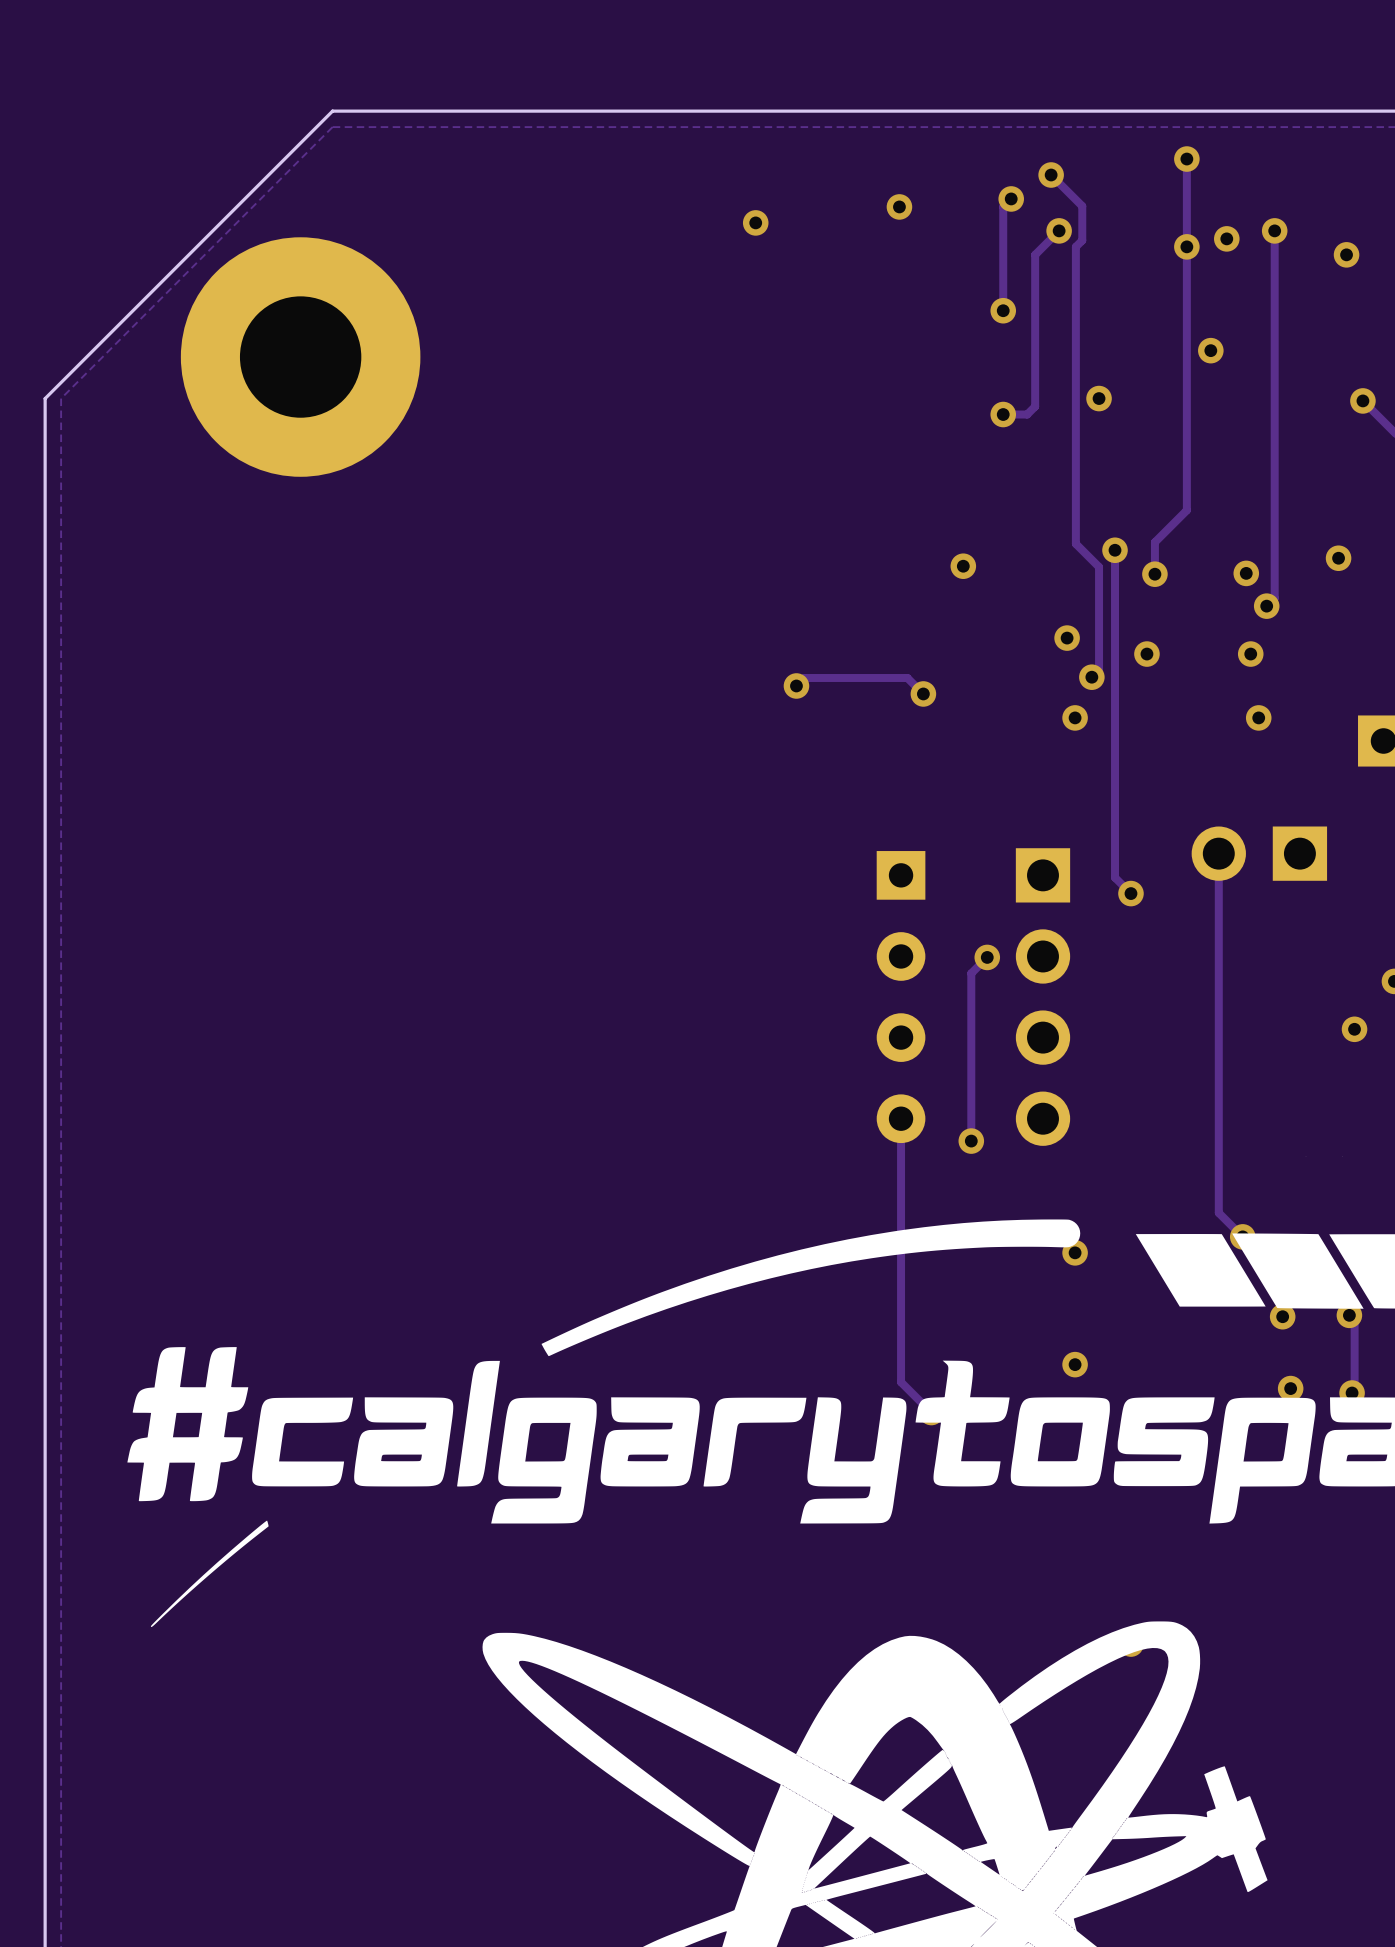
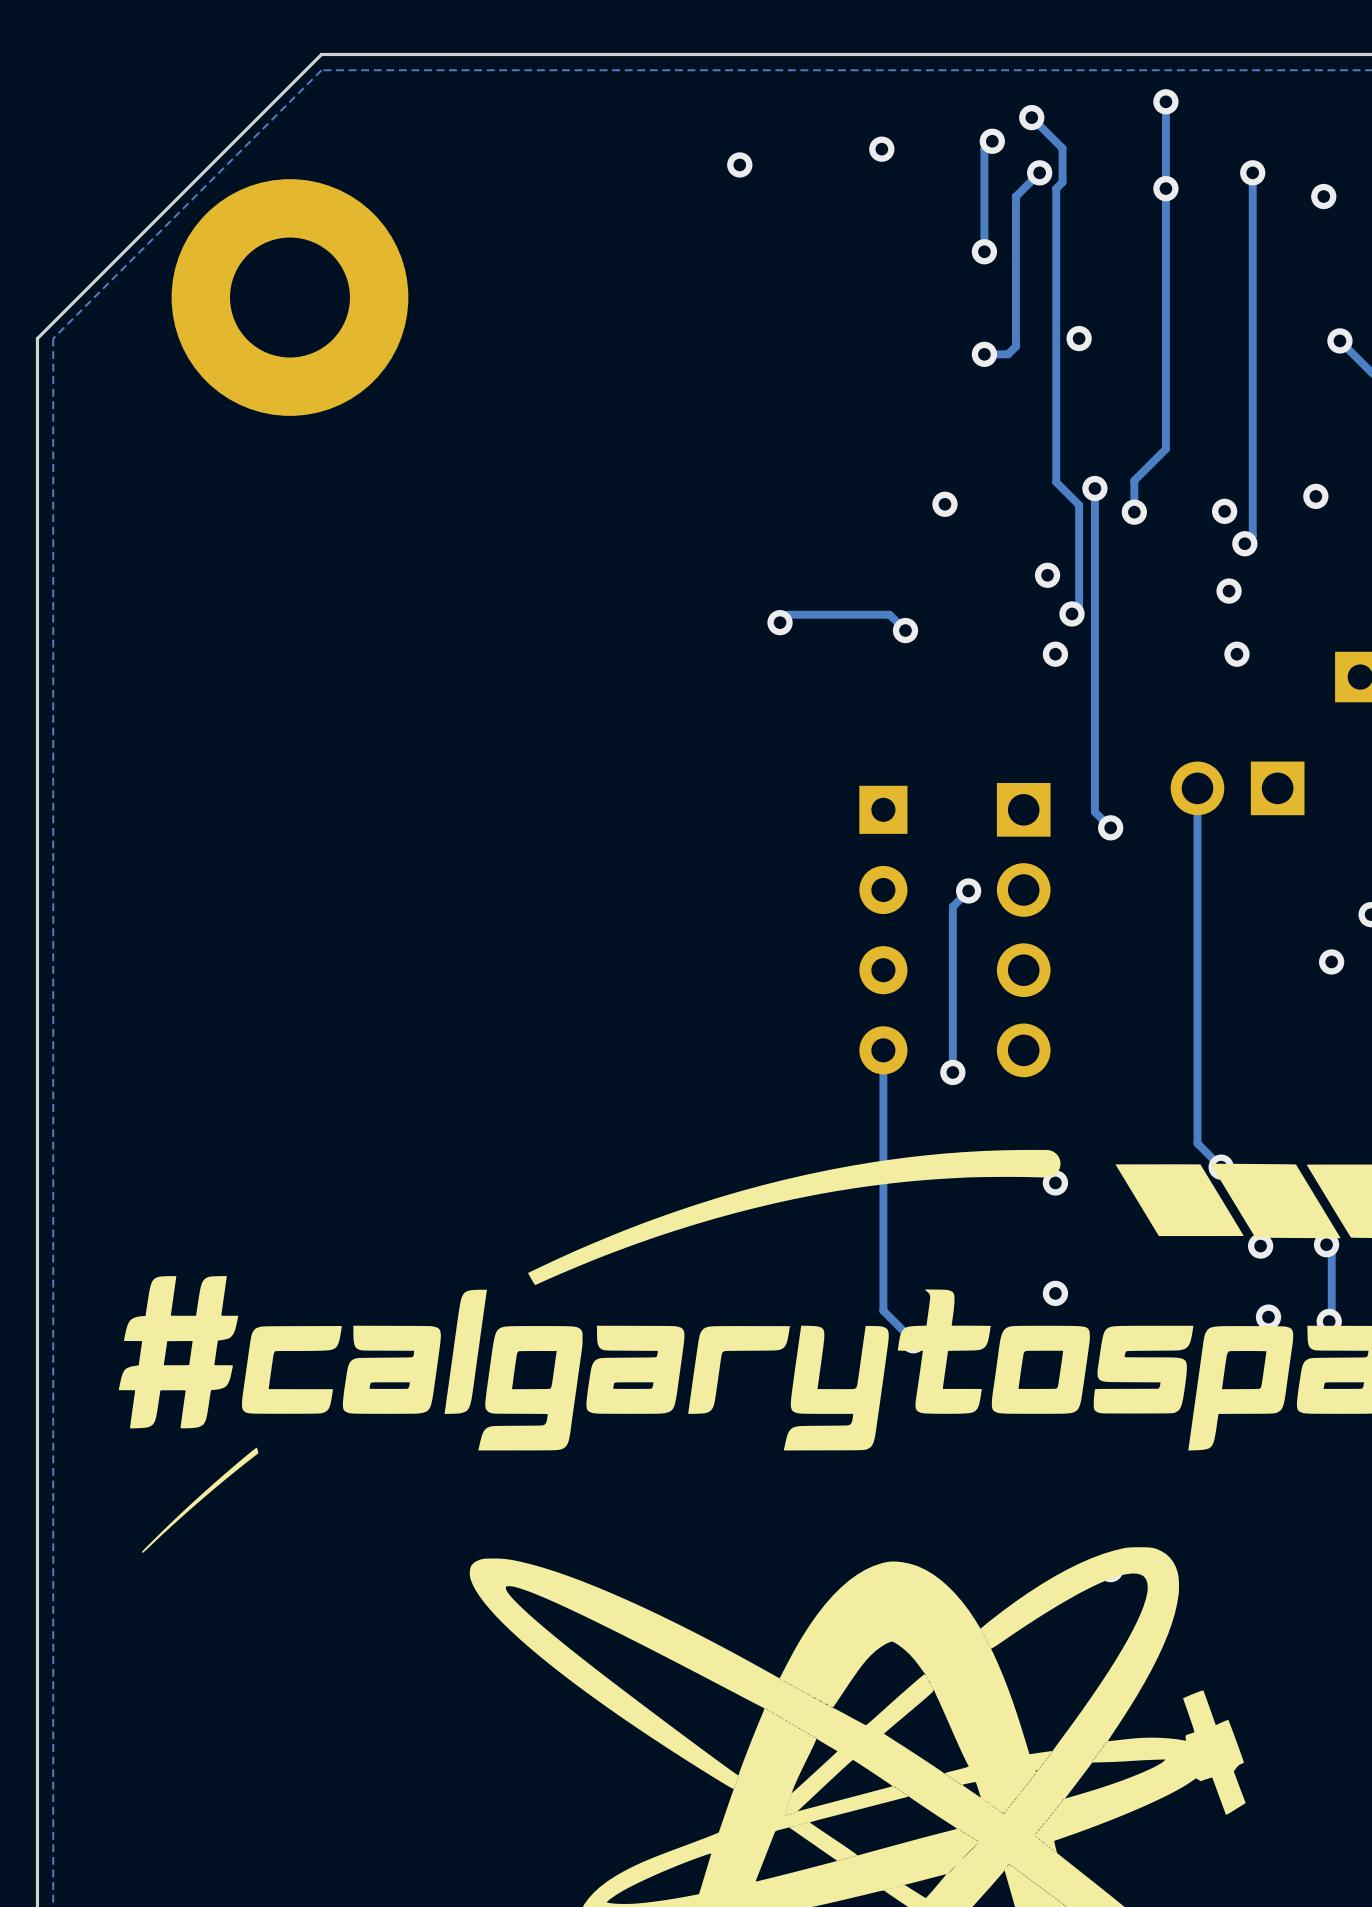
via: (1226, 238) -> none
via: (1210, 350) -> none
via: (1146, 654) -> none

